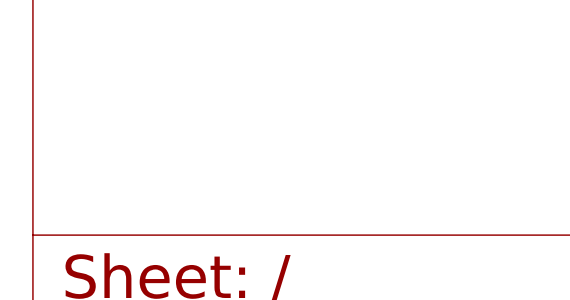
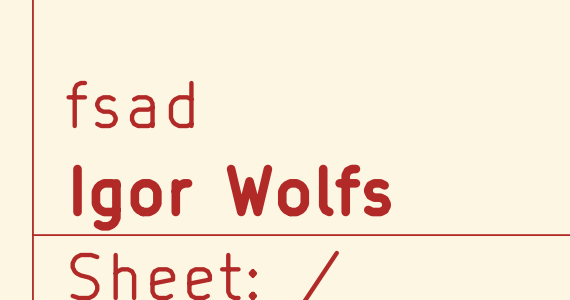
title block: none -> fsad (130, 104)
title block: none -> Igor Wolfs (232, 197)

